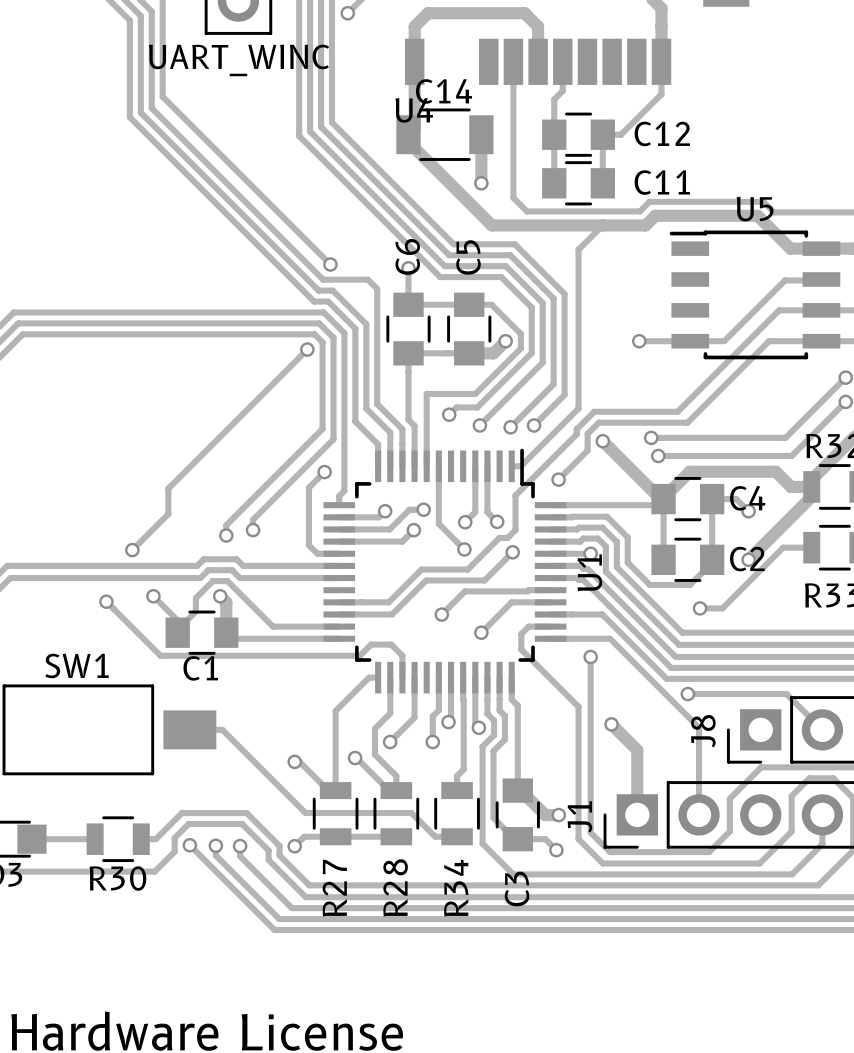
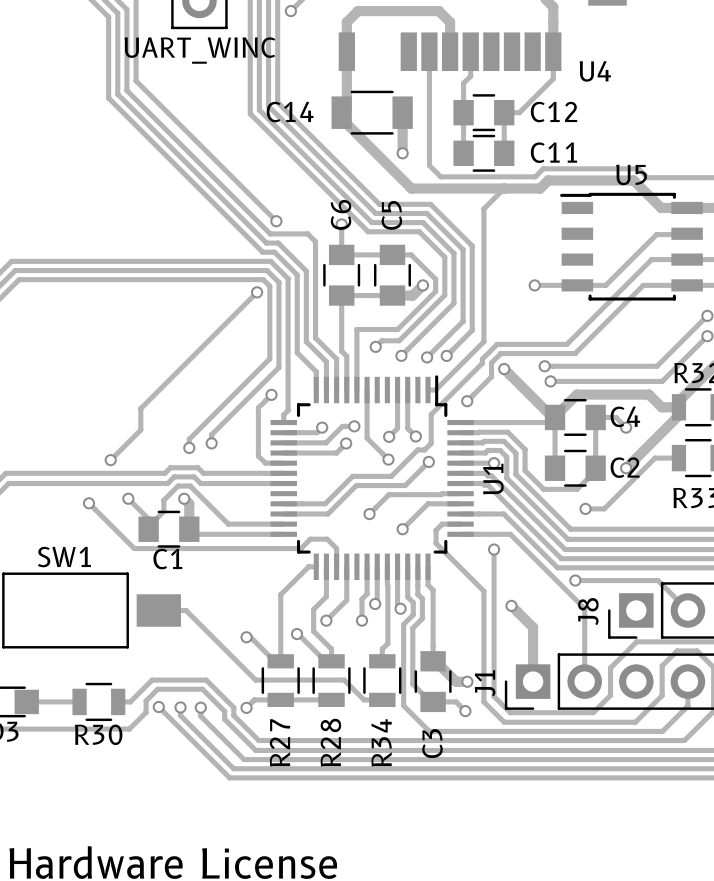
C14 name position: C14 (444, 91) -> C14 (290, 112)
U4 name position: U4 (414, 110) -> U4 (595, 71)

